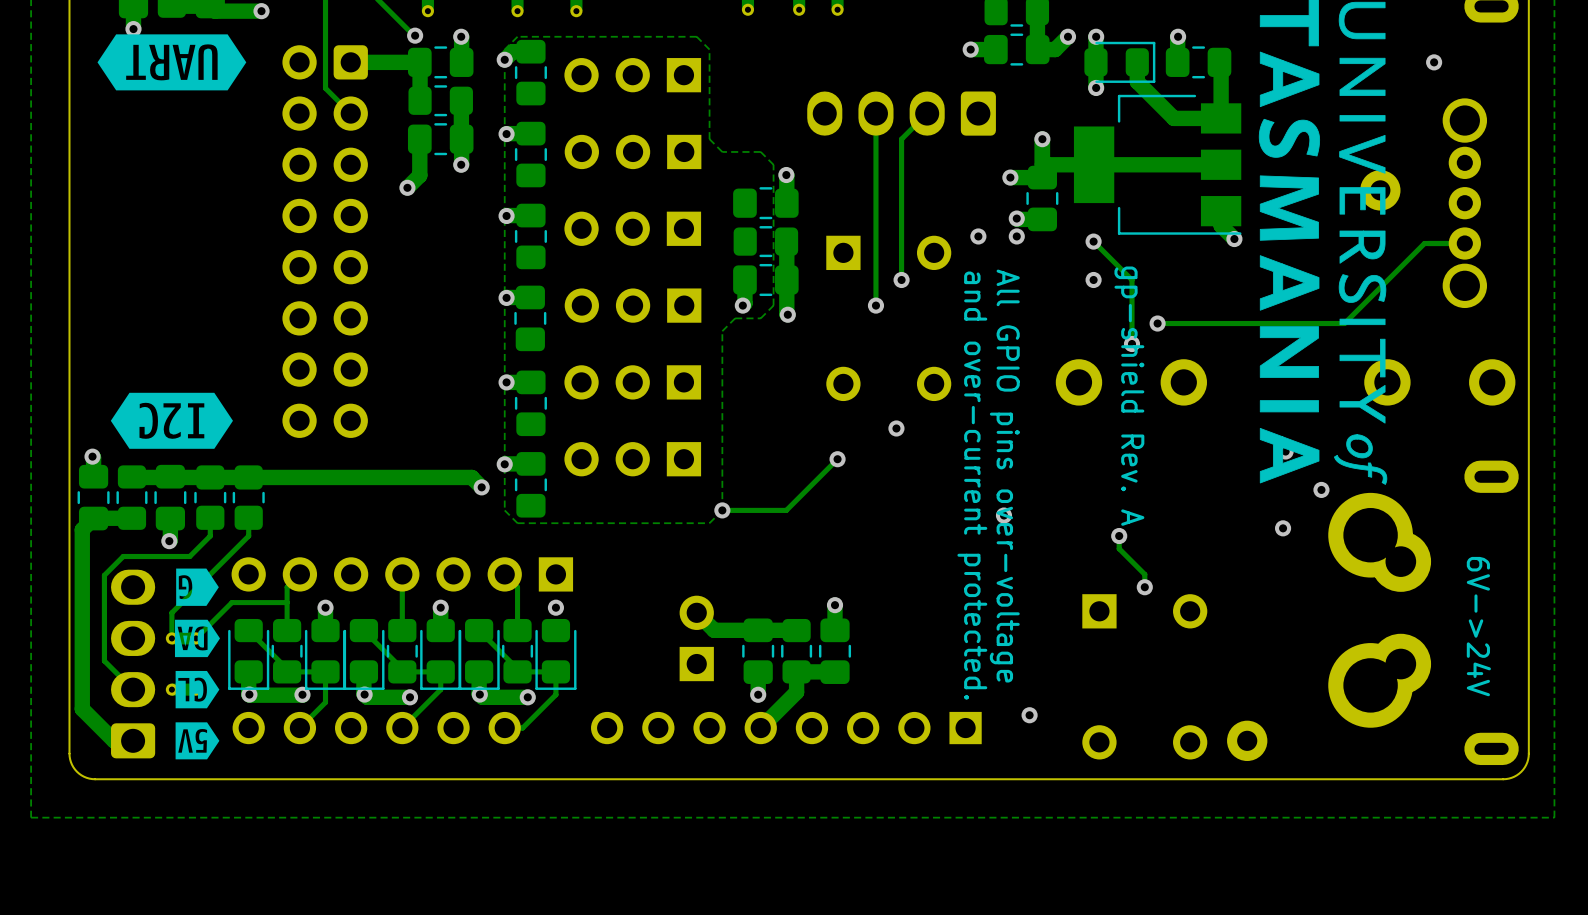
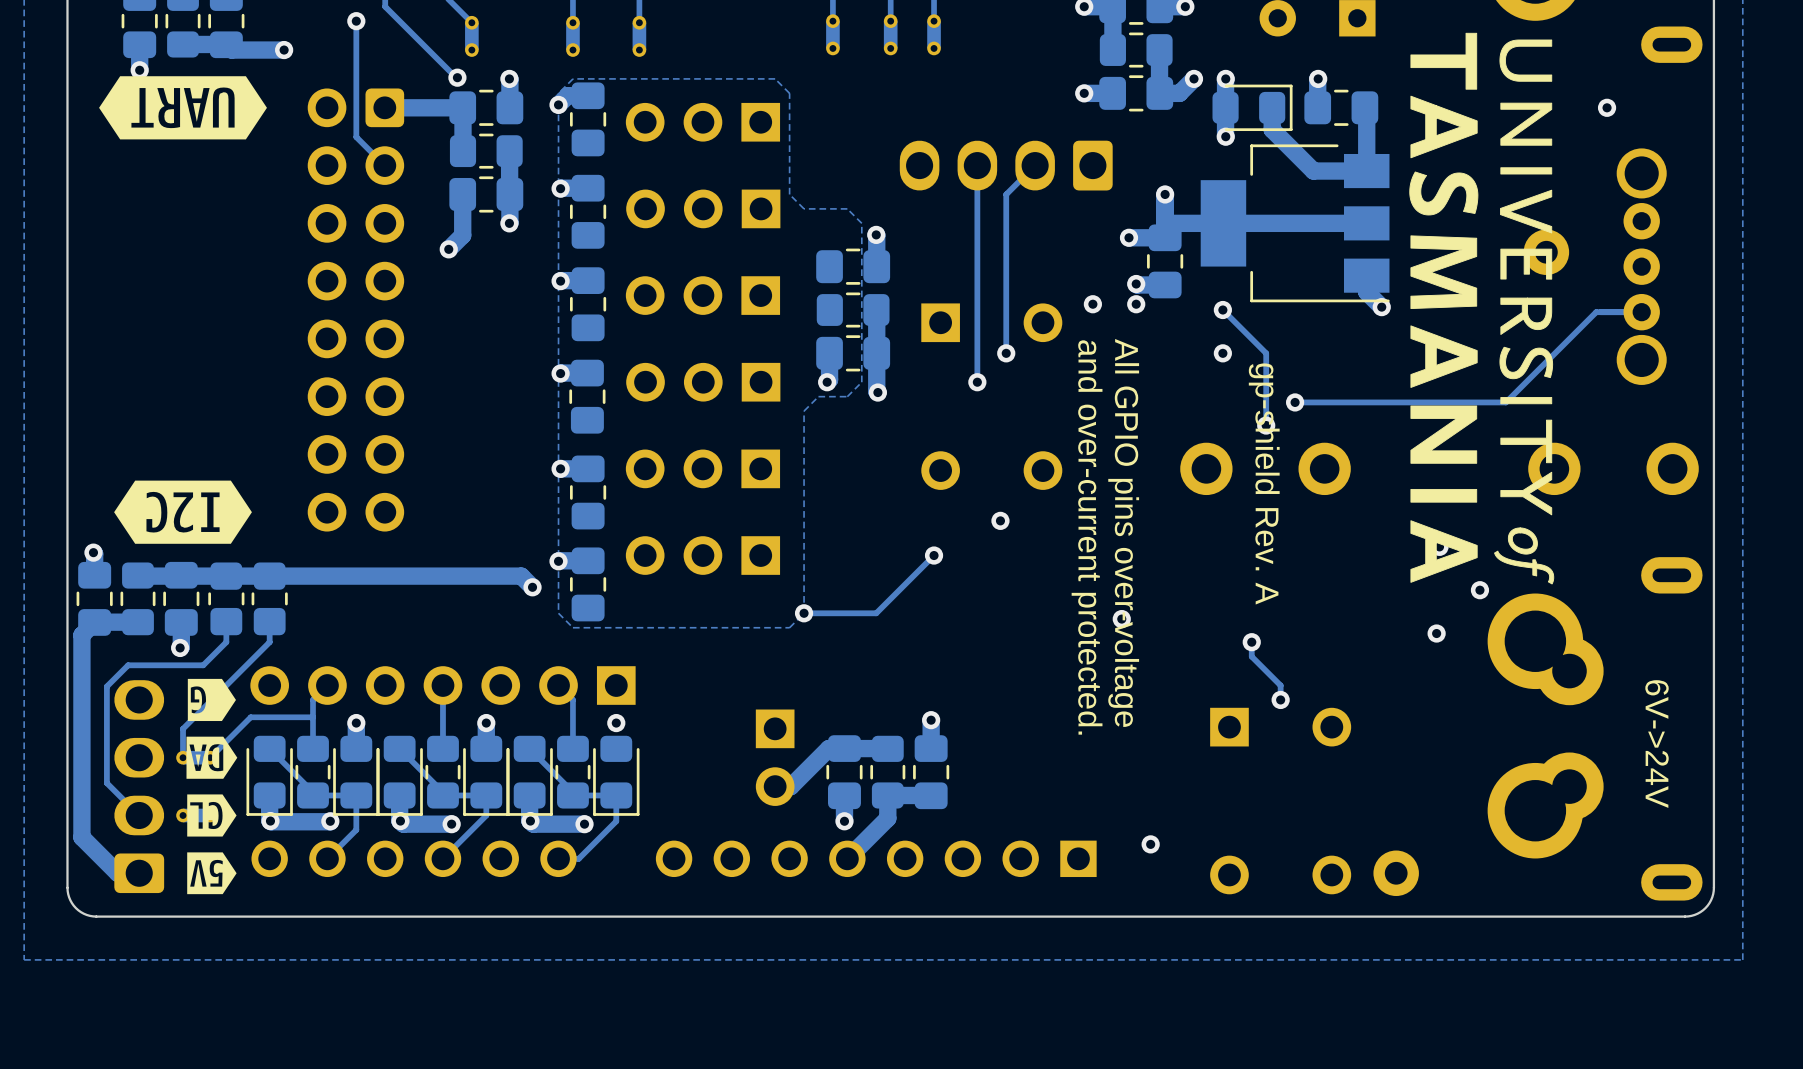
track: (696, 612) (714, 630) (744, 630) -> (775, 786) (790, 786) (828, 748)
part rotation: 0° (696, 638) -> 180° (775, 757)

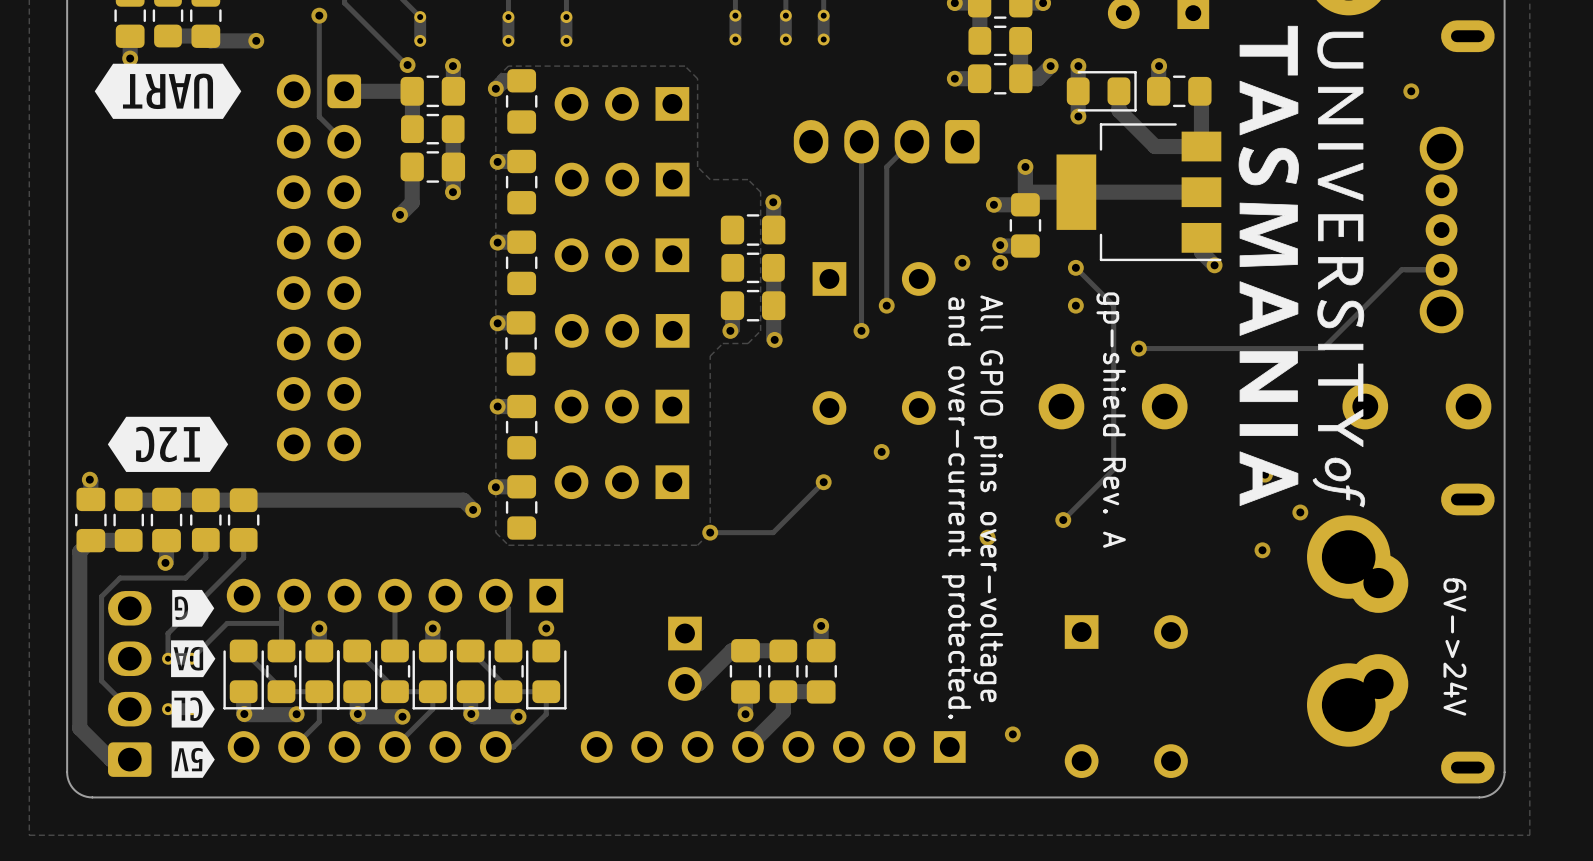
part: (1546, 252) -> none
track: none -> (1113, 368) (1113, 469) (1063, 520)
via: (1266, 425) -> none
track: (1251, 642) (1251, 656) (1280, 685) (1280, 699) -> none
via position: (1251, 642) -> (1063, 520)
via: (1280, 699) -> none
part: (1396, 873) -> none

